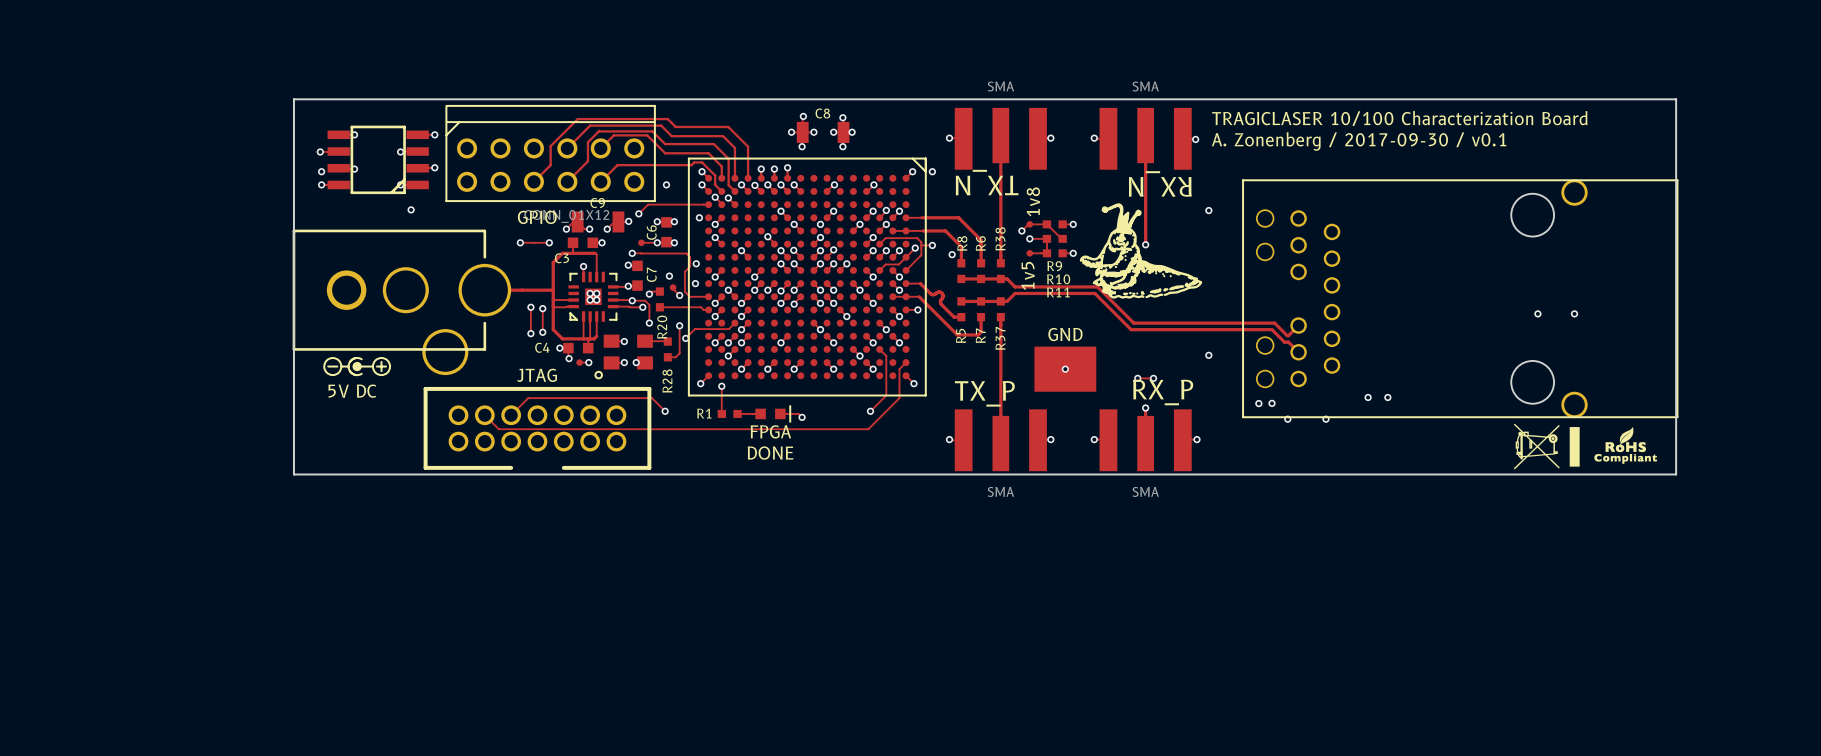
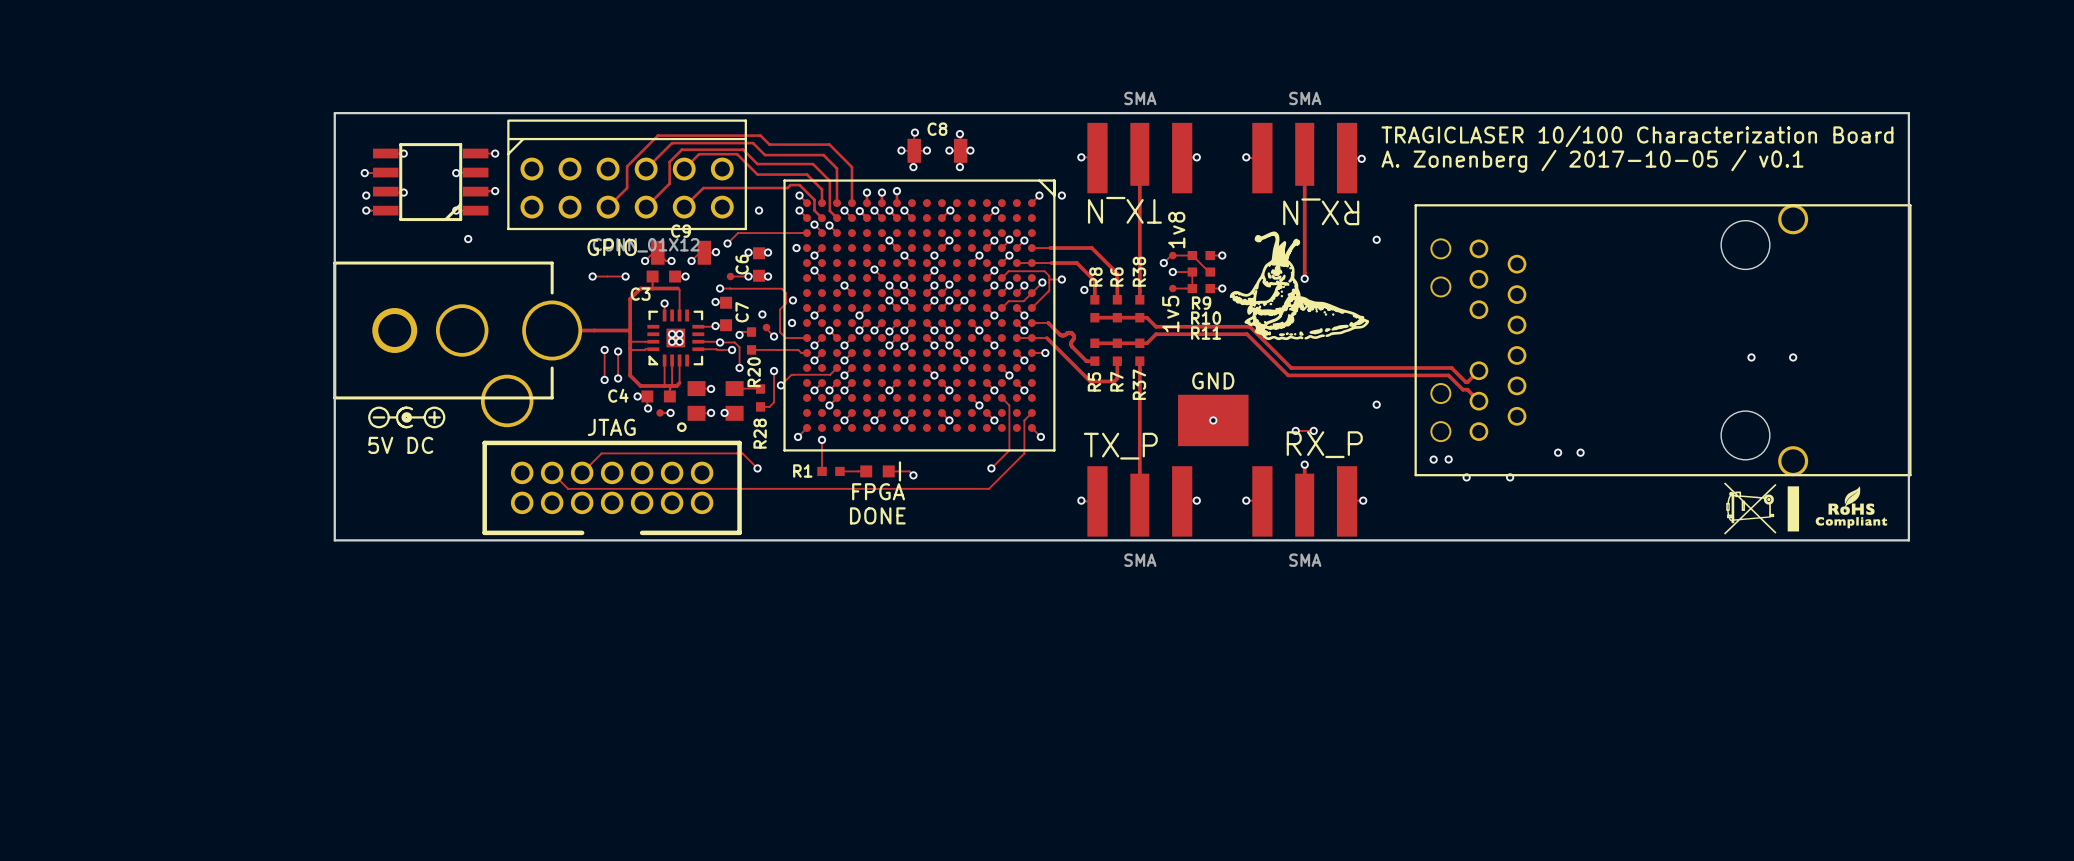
text: A. Zonenberg / 2017-09-30 / v0.1 (1359, 141) -> A. Zonenberg / 2017-10-05 / v0.1 (1592, 161)

